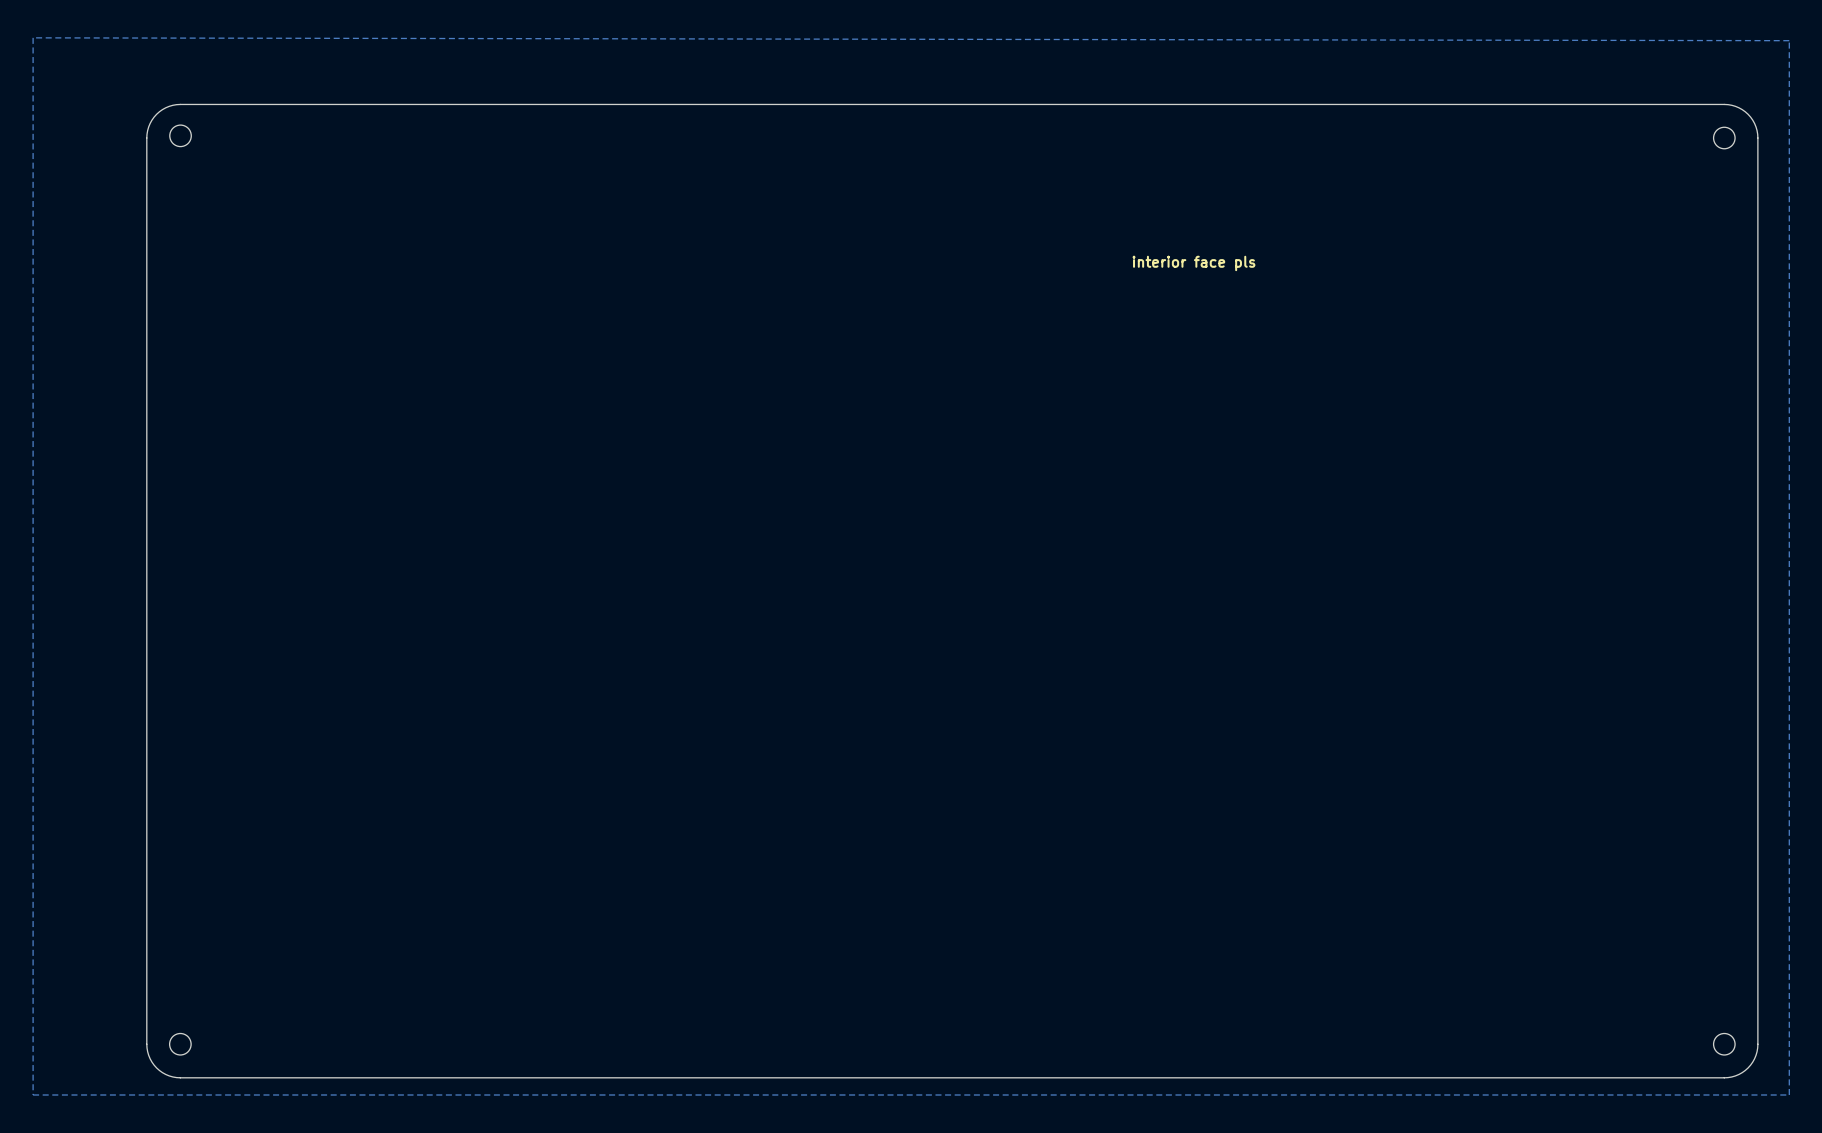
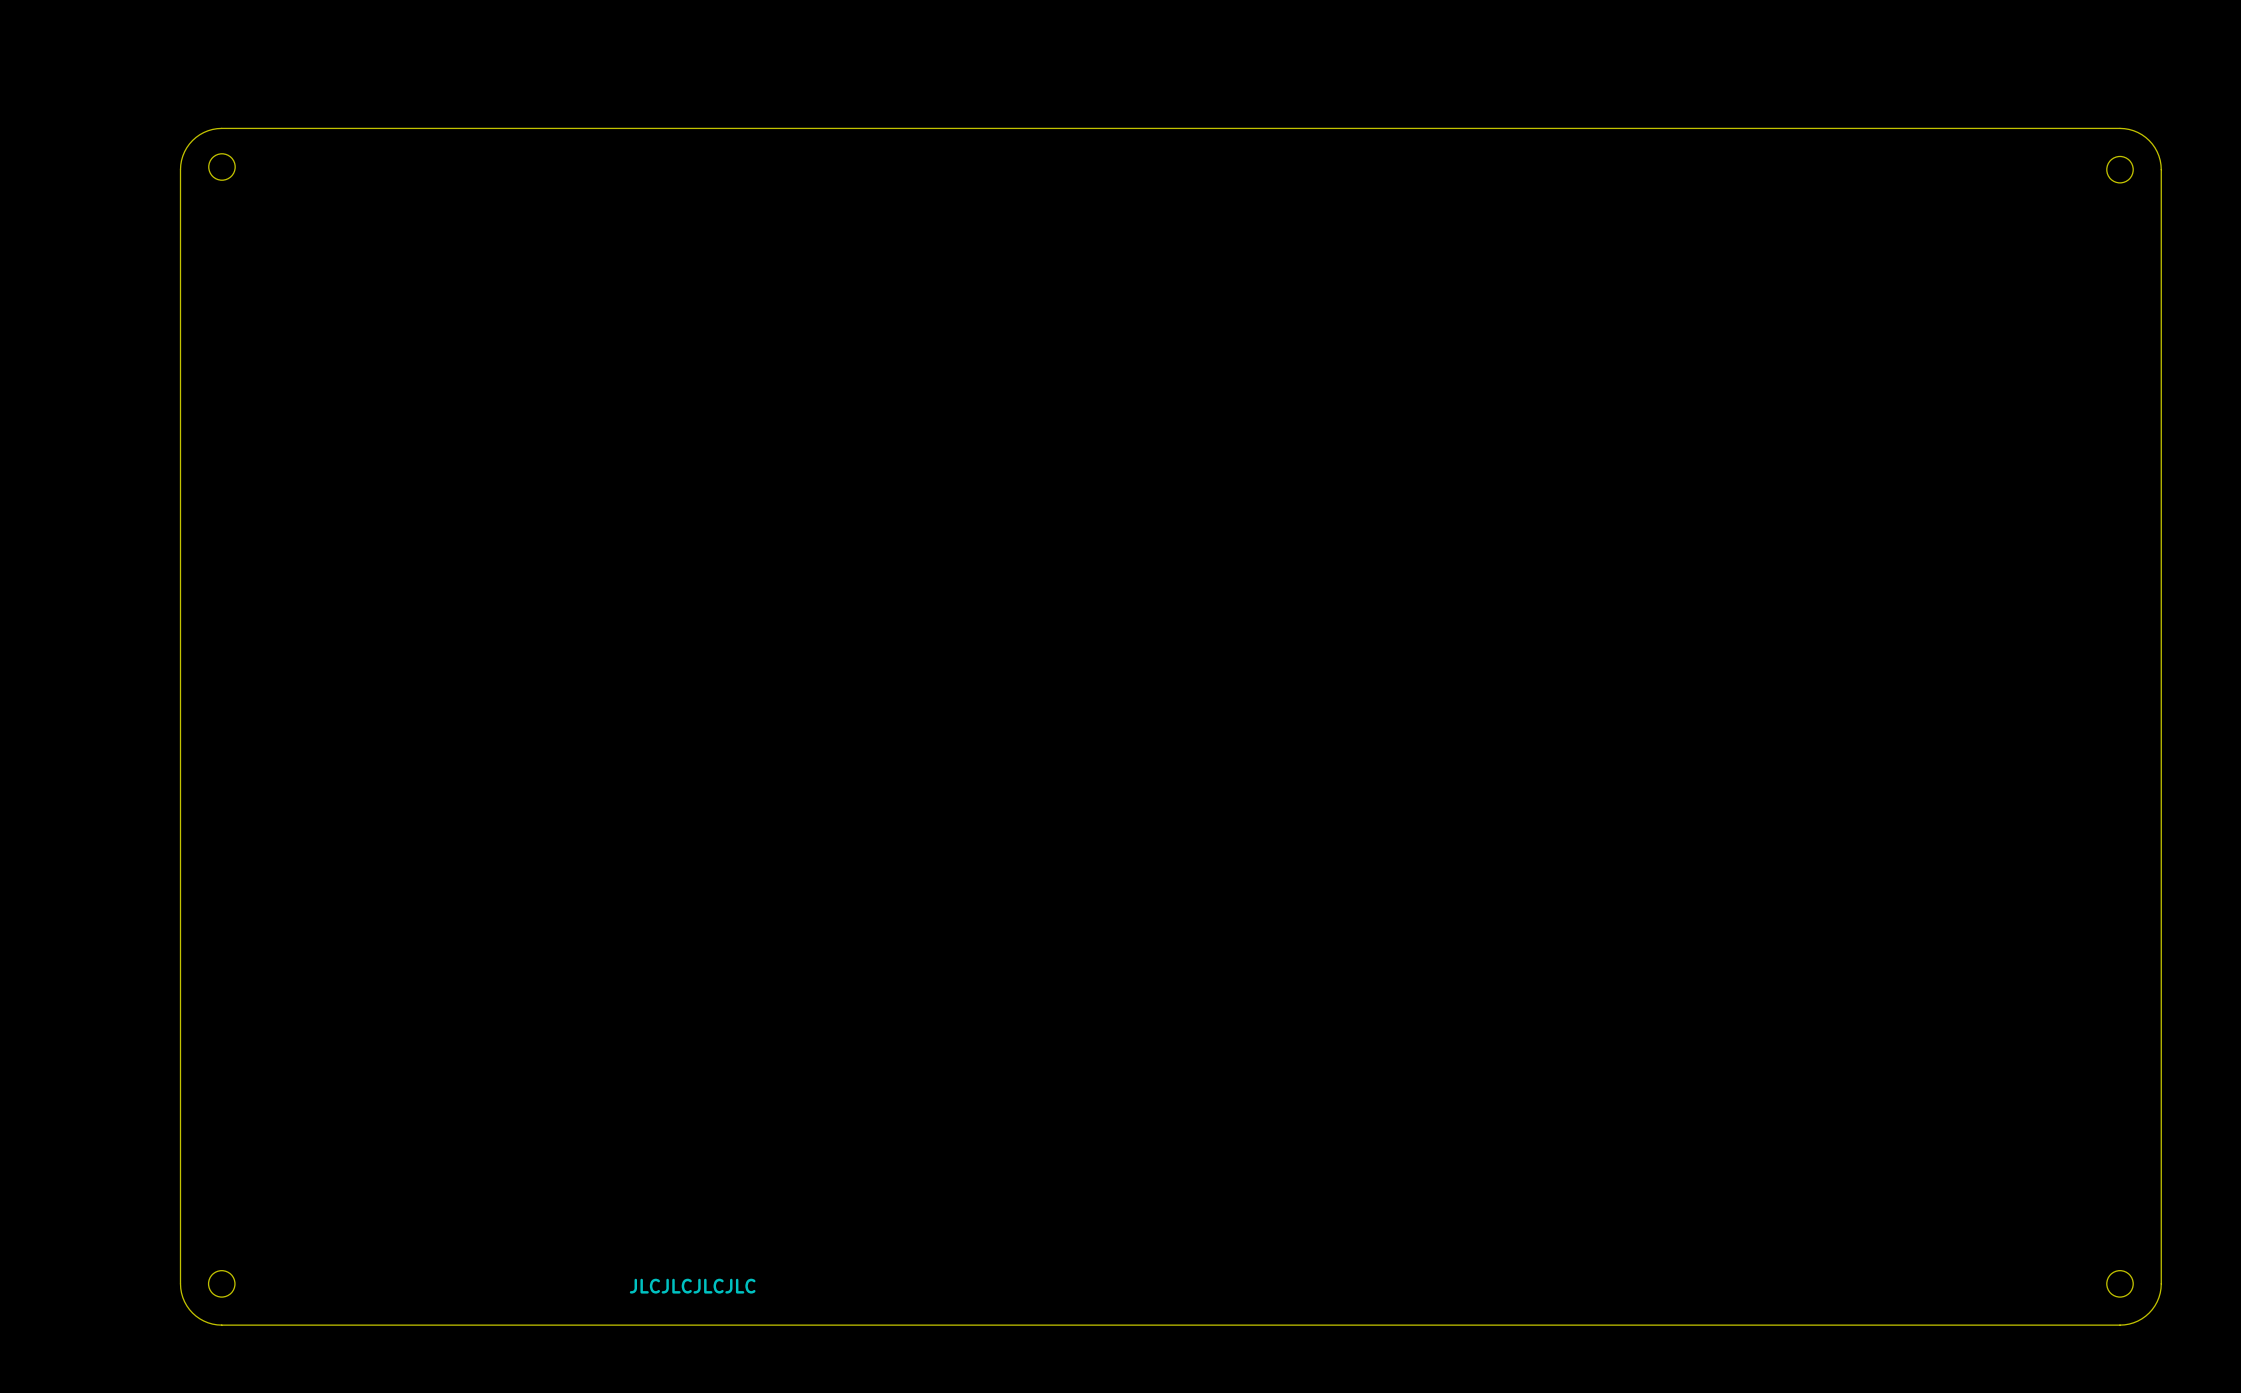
bottom zone outline: (33, 37) (1789, 40) (1789, 1094) (33, 1094) (33, 37) -> none
text: interior face pls (1193, 263) -> none
text: none -> JLCJLCJLCJLC (692, 1286)

